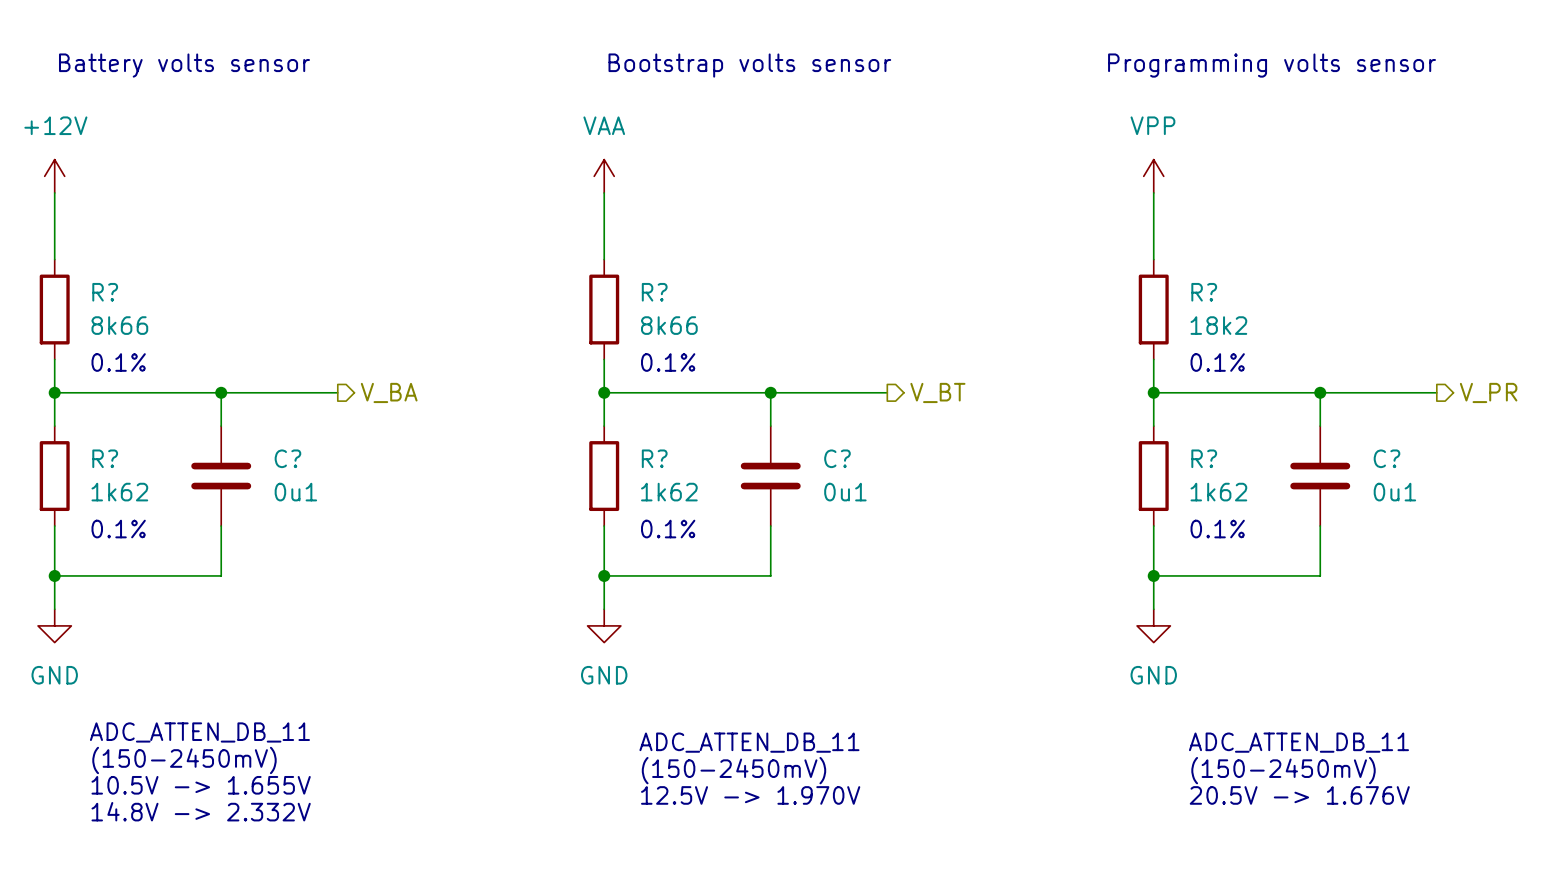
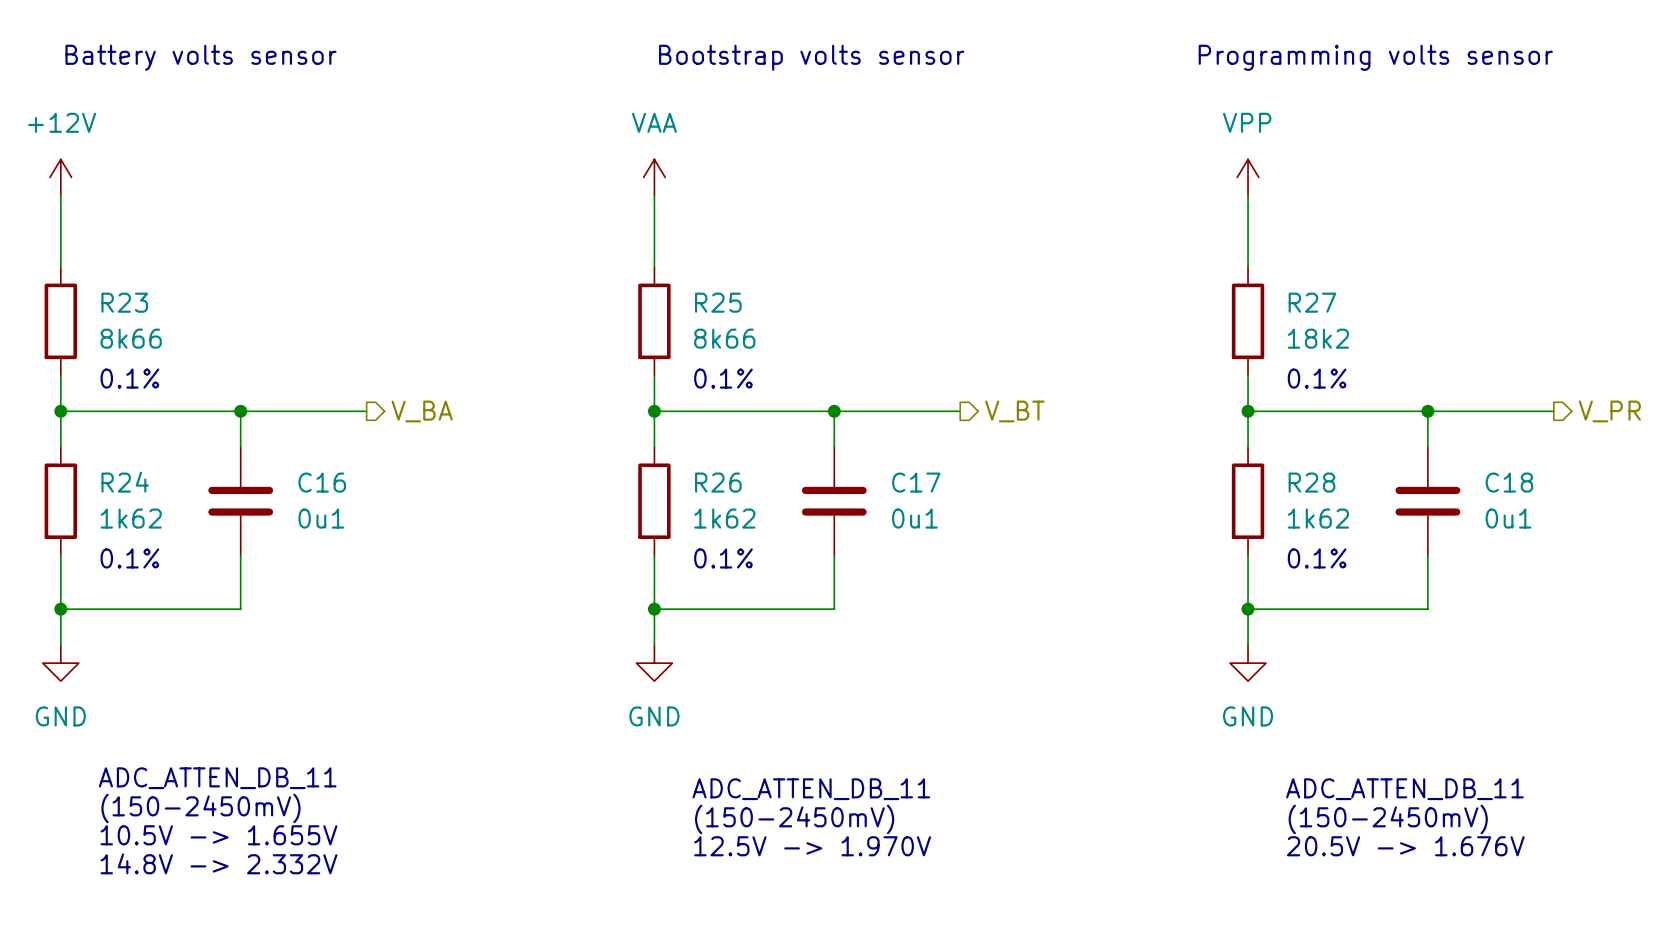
R? name: R? (105, 292) -> R23 (124, 302)
R? name: R? (654, 292) -> R25 (718, 302)
R? name: R? (1204, 292) -> R27 (1312, 302)
R? name: R? (105, 458) -> R24 (125, 482)
C? name: C? (287, 458) -> C16 (322, 482)
R? name: R? (654, 458) -> R26 (718, 482)
C? name: C? (837, 458) -> C17 (916, 482)
R? name: R? (1204, 458) -> R28 (1311, 482)
C? name: C? (1386, 458) -> C18 (1509, 482)

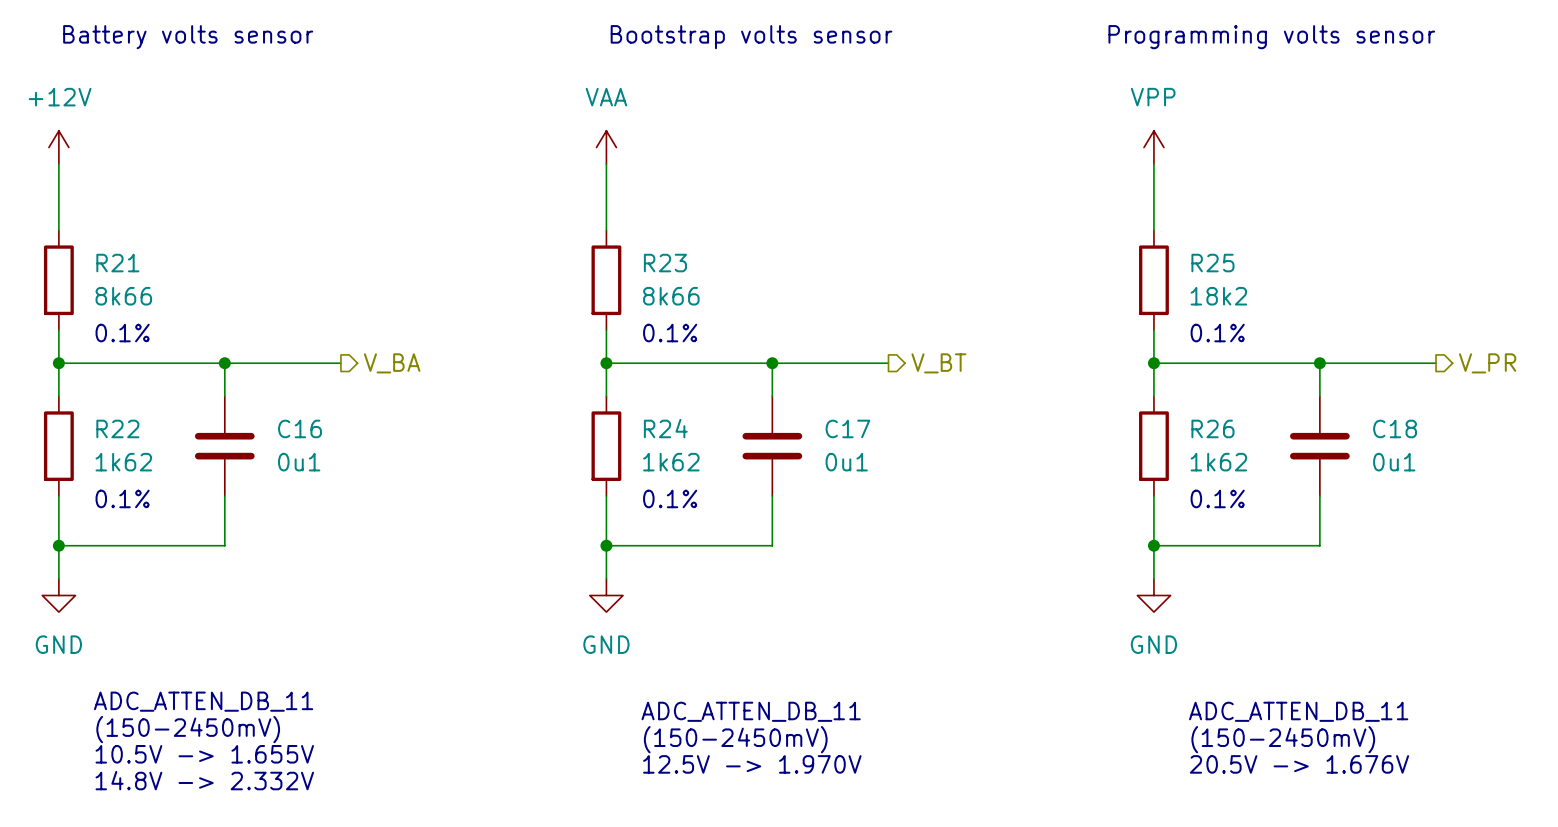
R23 name: R23 (124, 302) -> R21 (117, 263)
R25 name: R25 (718, 302) -> R23 (665, 263)
R27 name: R27 (1312, 302) -> R25 (1212, 263)
R24 name: R24 (125, 482) -> R22 (117, 428)
R26 name: R26 (718, 482) -> R24 (665, 428)
R28 name: R28 (1311, 482) -> R26 (1212, 428)

